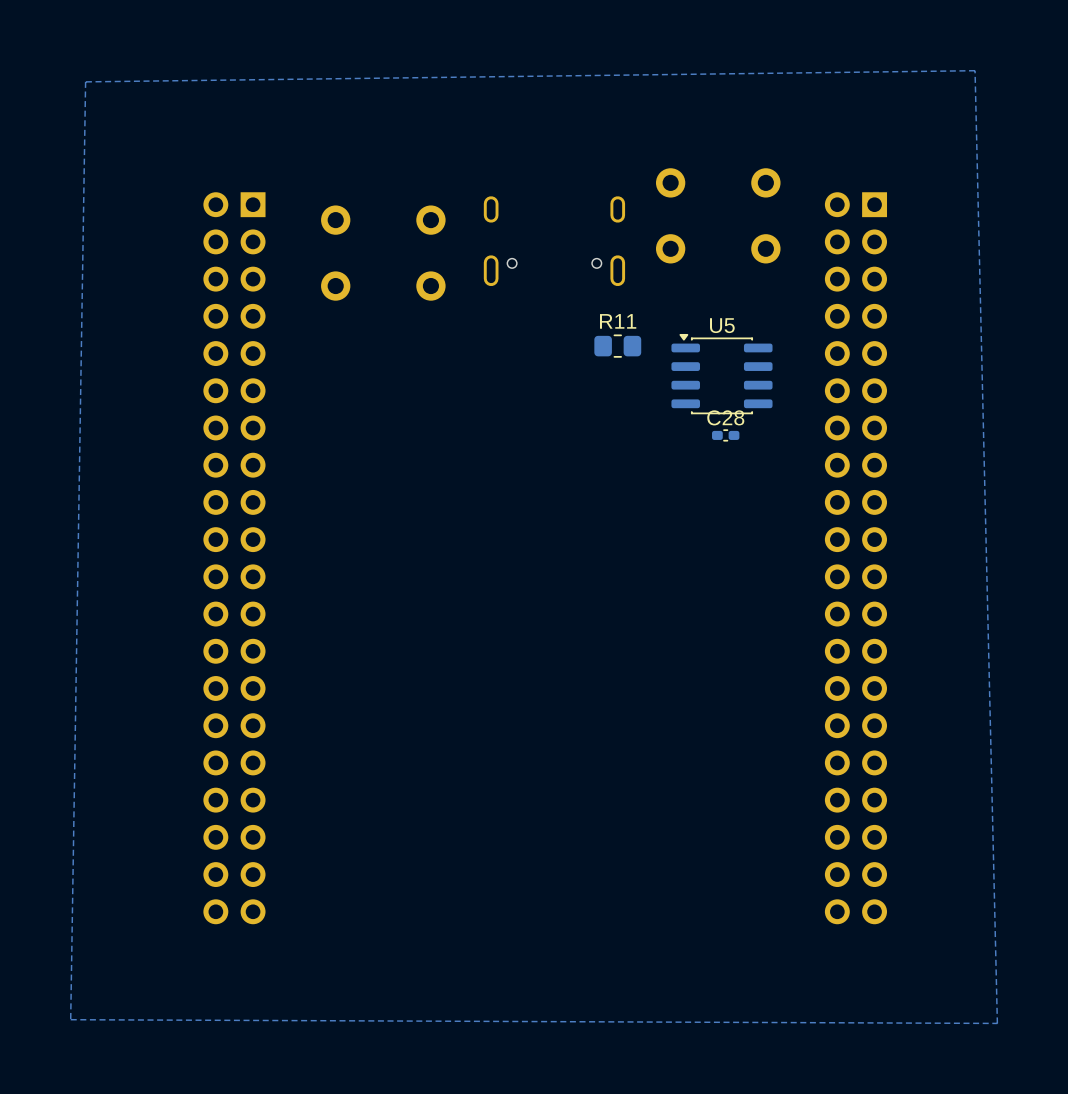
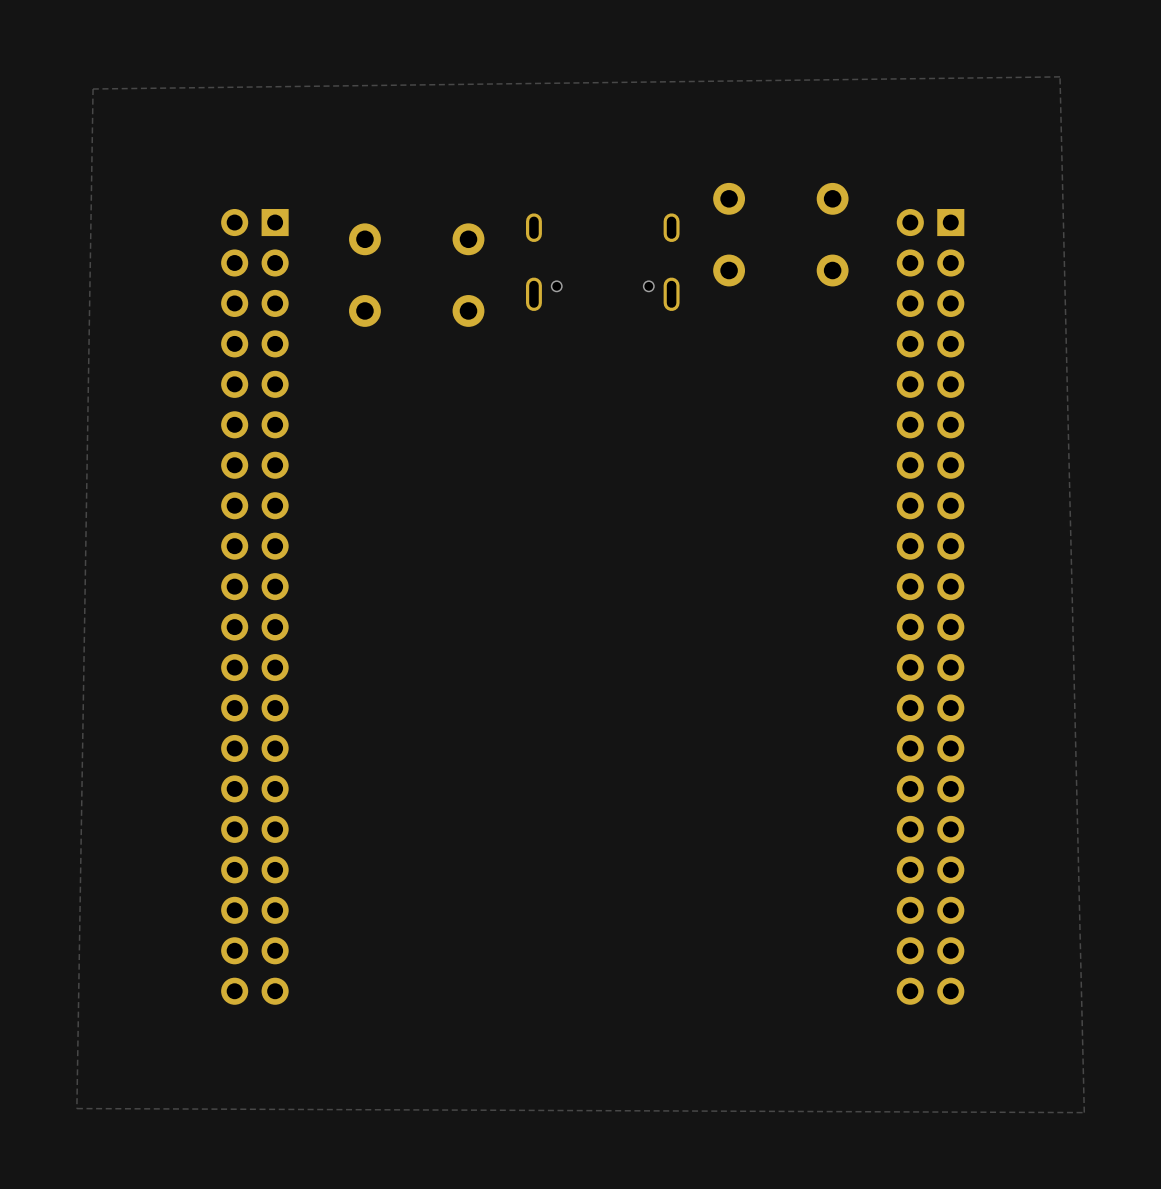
R11: (617, 346) -> none
U5: (721, 374) -> none
C28: (725, 435) -> none

